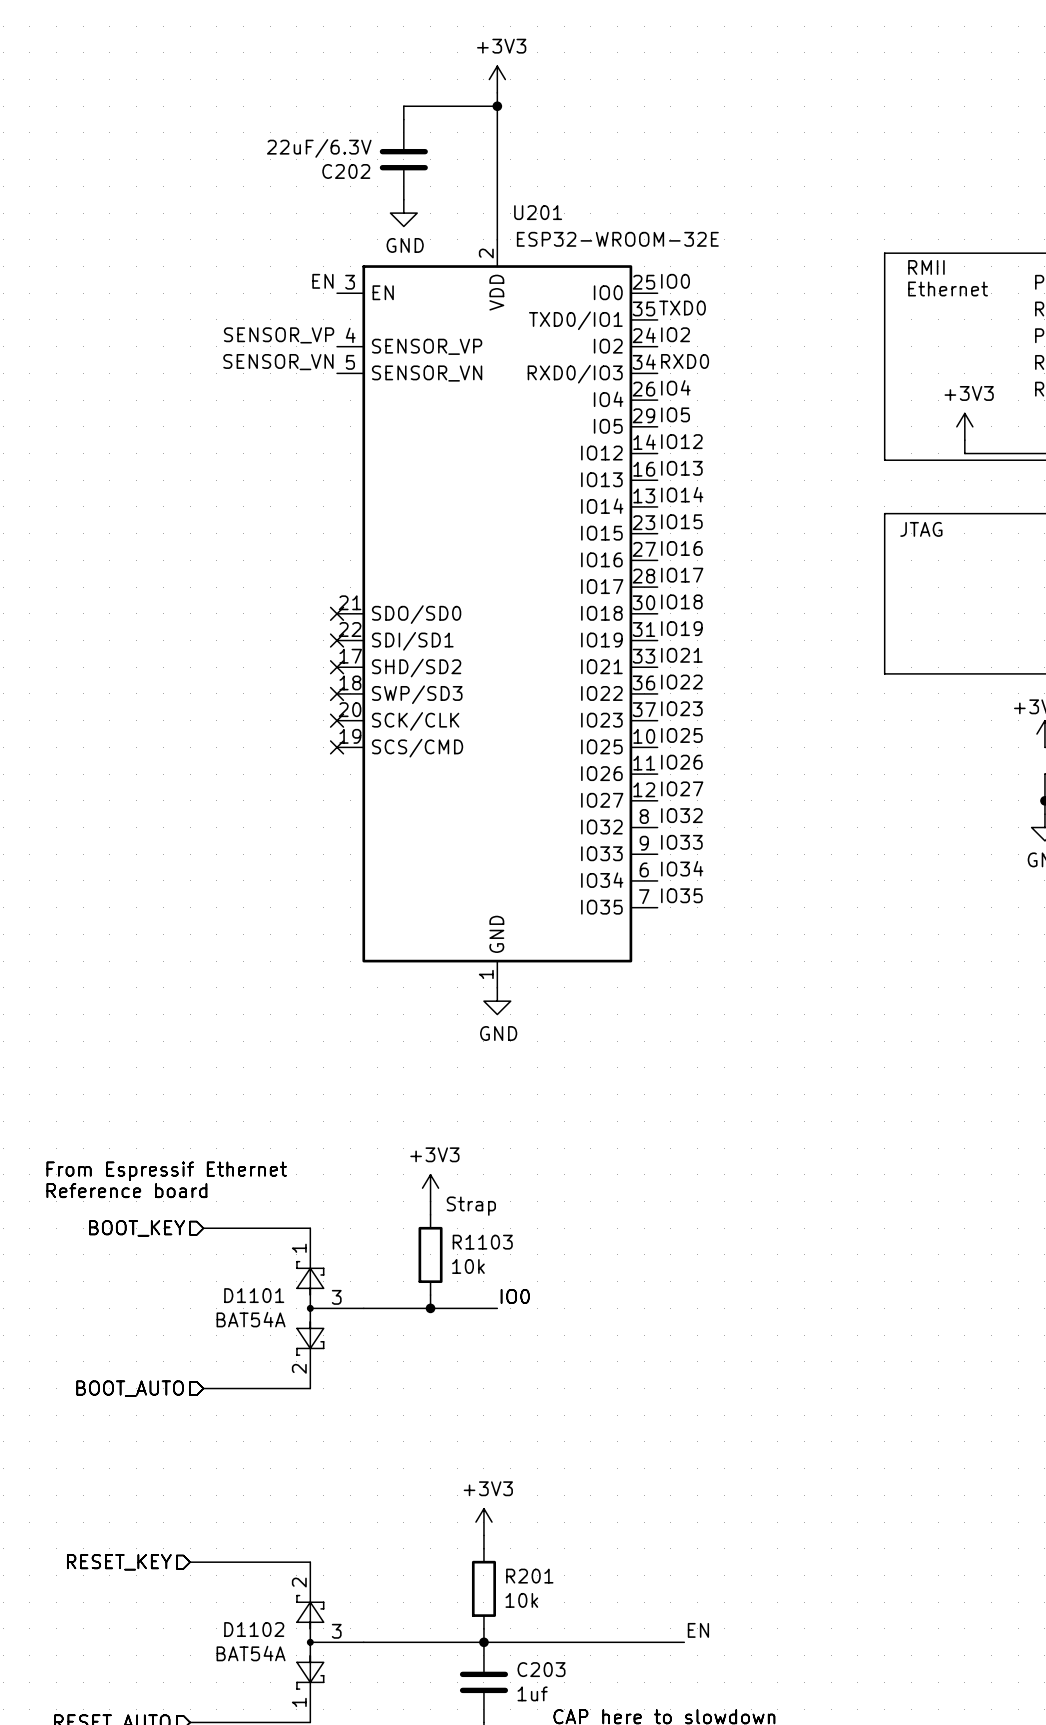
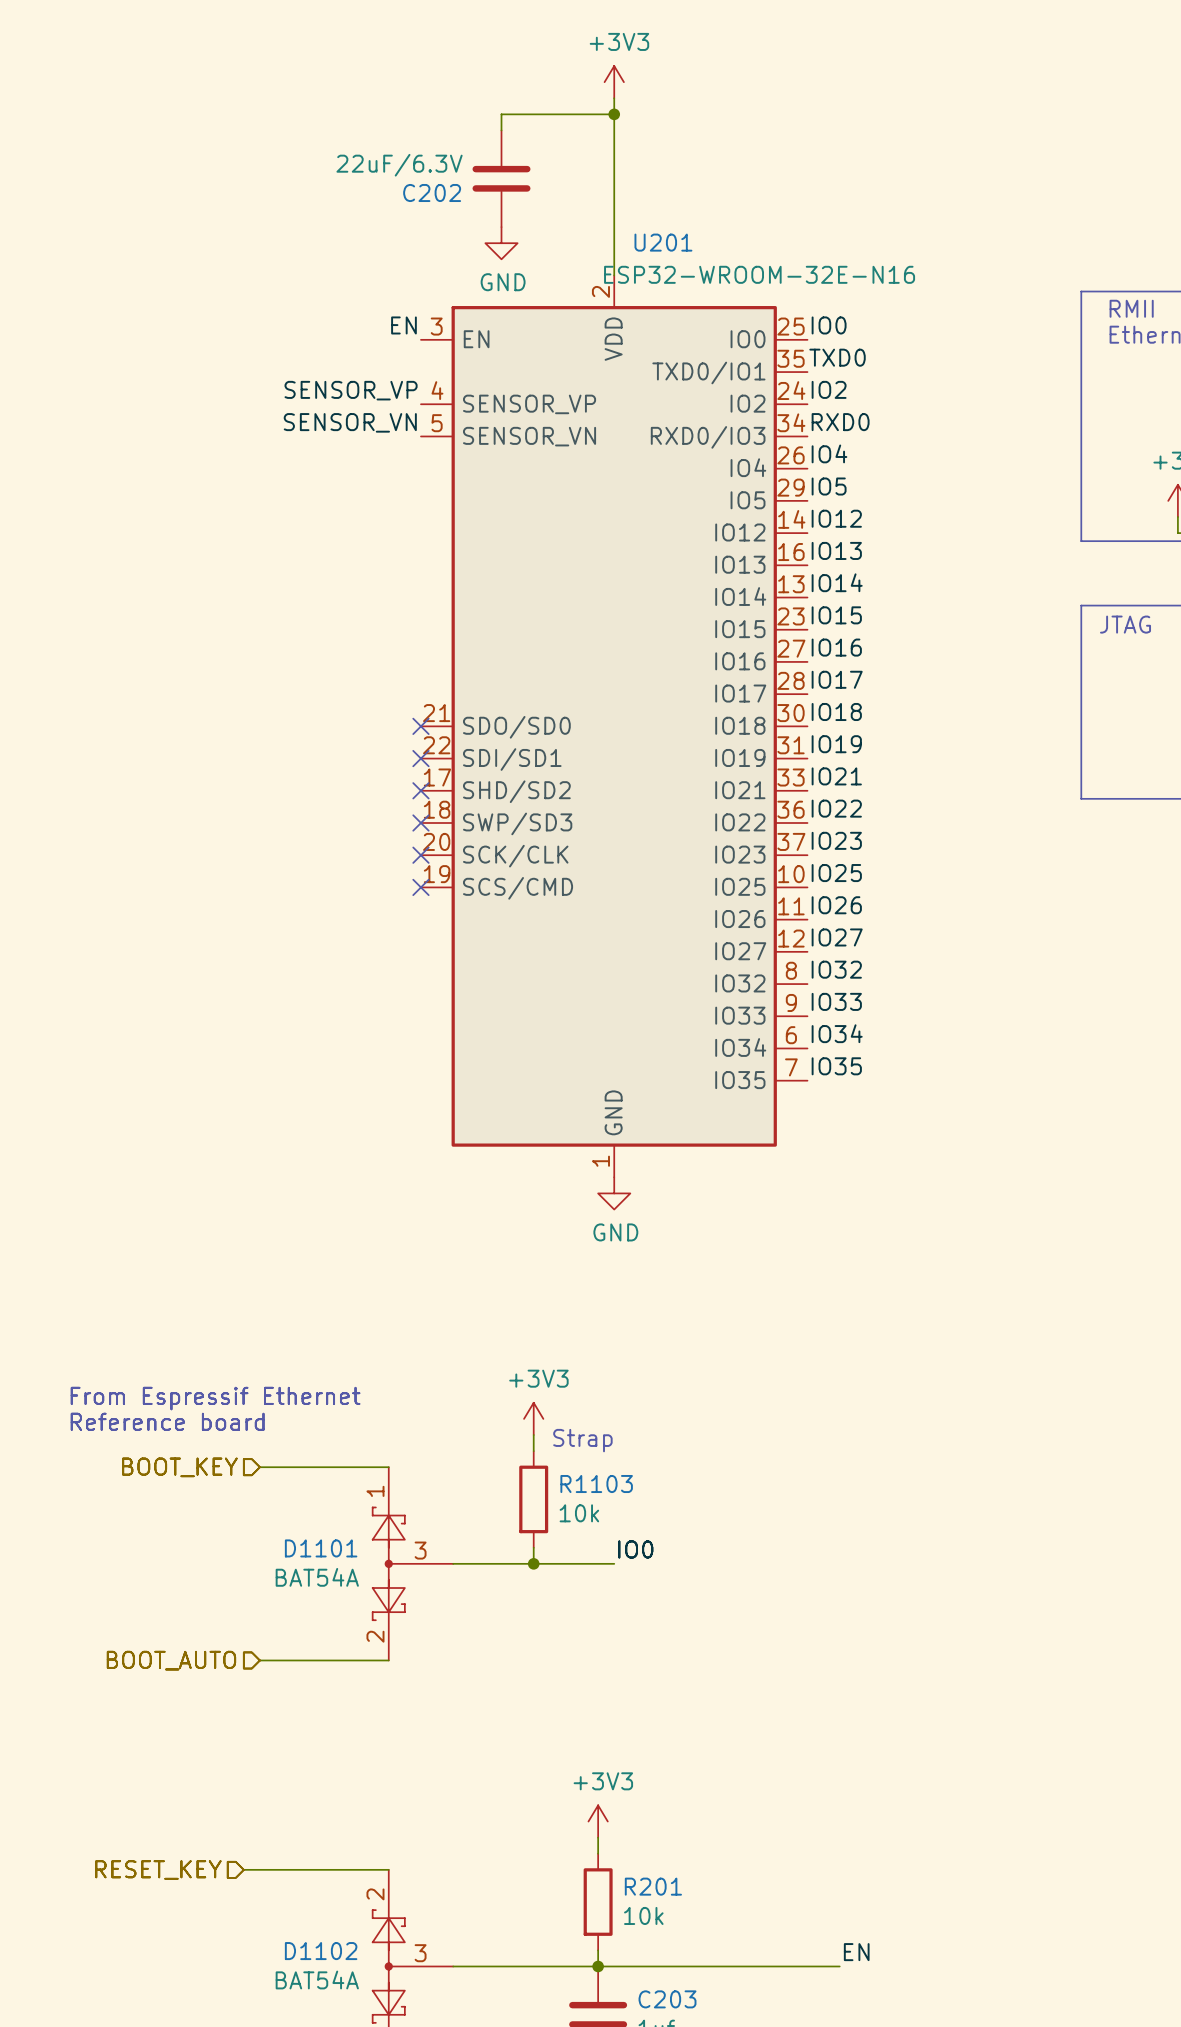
U201 value: ESP32-WROOM-32E (617, 239) -> ESP32-WROOM-32E-N16 (759, 274)

